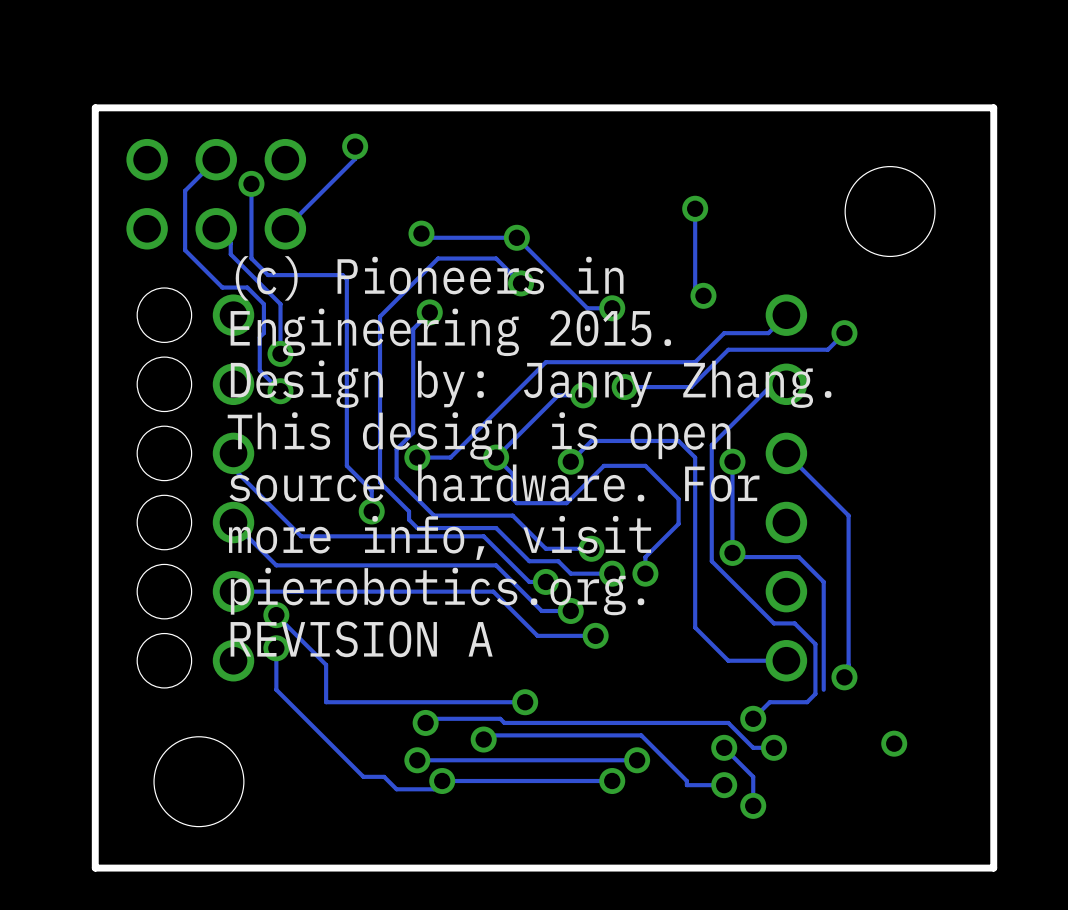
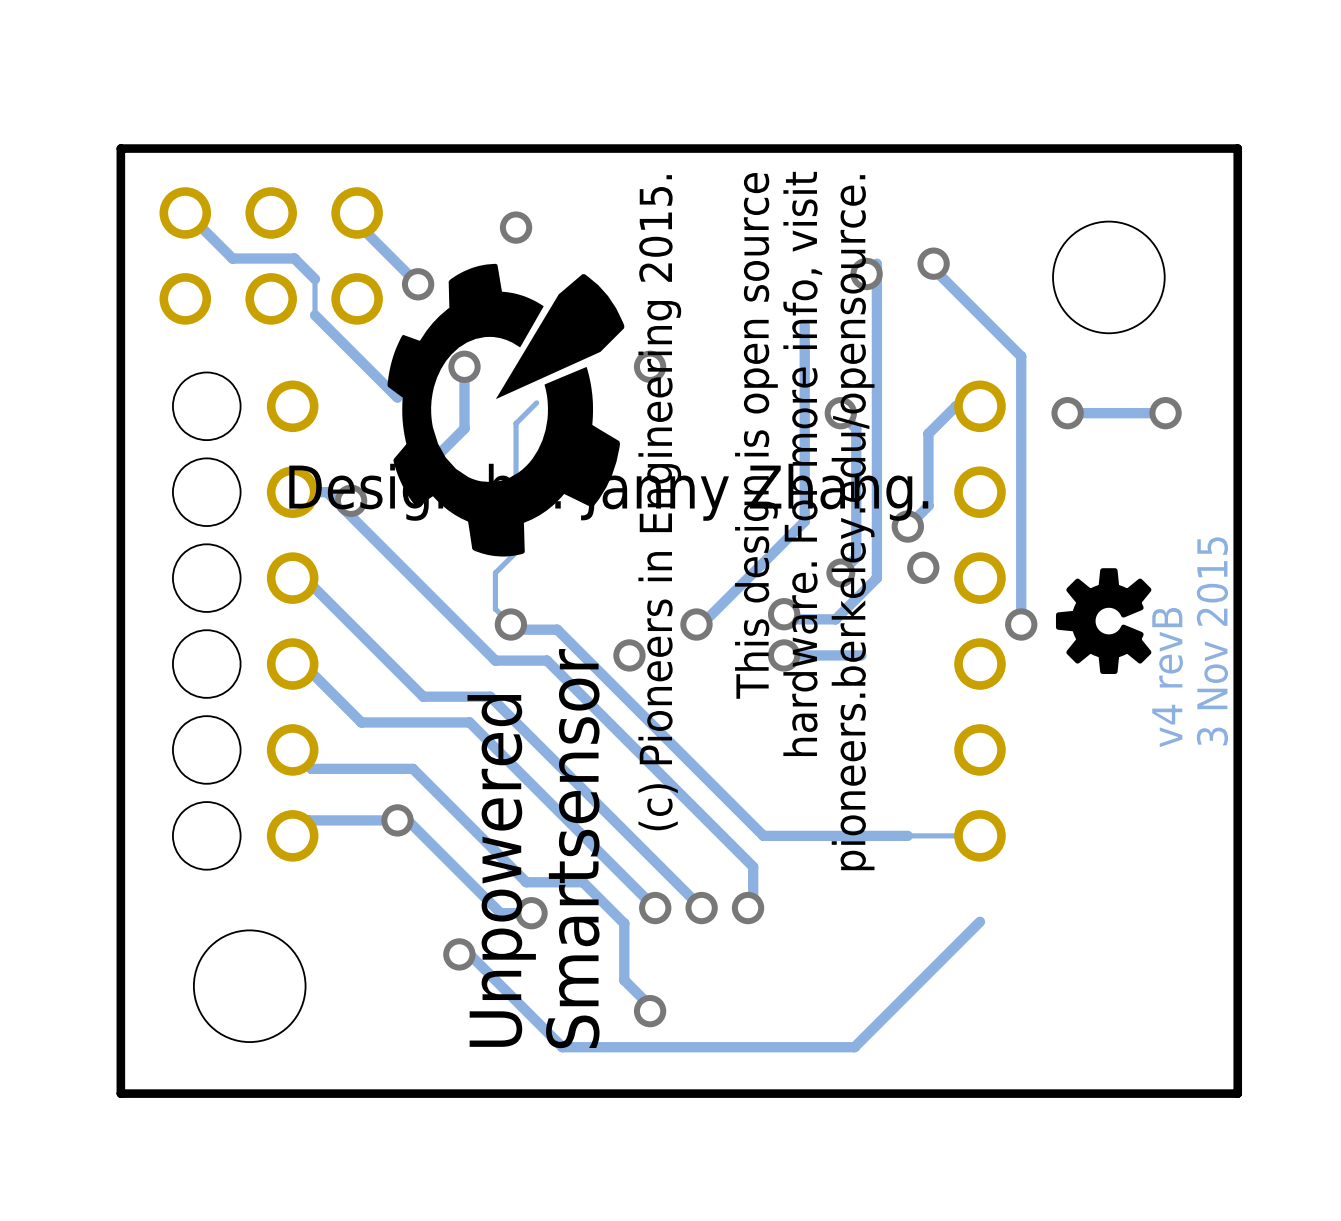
track: (355, 146) (355, 158) (285, 228) -> none
via: (355, 146) -> none
track: (216, 159) (185, 190) (185, 250) (222, 287) (247, 287) (263, 304) (263, 333) (259, 337) (259, 370) (280, 391) -> none
track: none -> (357, 212) (357, 223) (418, 284)
via: none -> (516, 227)
track: (251, 183) (251, 212) -> (185, 212) (232, 258) (294, 258) (315, 279)
via: (251, 183) -> none
drawing: none -> [387, 263, 625, 557]
track: none -> (876, 263) (876, 578) (835, 619) (789, 619) (784, 614)
track: none -> (933, 263) (933, 268) (1021, 356) (1021, 624)
via: none -> (933, 263)
track: (695, 208) (695, 287) (703, 295) -> none
via: none -> (418, 284)
track: (216, 228) (230, 243) (230, 254) (280, 304) (280, 353) -> none
track: (421, 233) (425, 237) (516, 237) (587, 308) (612, 308) -> none
via: (421, 233) -> none
via: (516, 237) -> none
track: (251, 241) (251, 258) (268, 275) (342, 275) (346, 279) (346, 465) (371, 490) (371, 511) -> (315, 315) (397, 397)
track: none -> (804, 325) (804, 521) (701, 624) (696, 624)
text: (c) Pioneers in (429, 278) -> none
track: none -> (464, 366) (464, 428) (438, 454)
via: none -> (464, 366)
track: (521, 283) (496, 258) (438, 258) (380, 316) (380, 482) (409, 511) (409, 519) (417, 528) (496, 528) (529, 561) (558, 561) (570, 573) (612, 573) -> none
via: (703, 295) -> none
via: (612, 308) -> none
via: (429, 312) -> none
track: (786, 315) (768, 333) (724, 333) (695, 362) (545, 362) (450, 457) (417, 457) -> (979, 406) (955, 406) (928, 433) (928, 505) (907, 526)
track: none -> (840, 413) (856, 428) (856, 557) (840, 572)
via: none -> (840, 413)
track: none -> (1165, 413) (1067, 413)
via: none -> (1165, 413)
text: Engineering 2015. (450, 332) -> none
track: (844, 333) (827, 349) (728, 349) (691, 387) (624, 387) -> none
via position: (844, 333) -> (1067, 413)
via: (280, 353) -> none
track: none -> (292, 492) (327, 492) (495, 660) (546, 660) (753, 866) (753, 902) (748, 908)
track: (786, 384) (772, 384) (711, 445) (711, 561) (773, 623) (794, 623) (815, 644) (815, 693) (807, 702) (769, 702) (753, 718) -> none
via: (624, 387) -> none
track: (583, 395) (558, 395) (496, 457) (512, 474) (512, 499) (516, 503) (566, 503) (603, 465) (645, 465) (678, 499) (678, 523) (645, 557) (645, 573) -> none
via: (583, 395) -> none
via: none -> (907, 526)
text: This design is open (479, 436) -> This design is open source (756, 435)
drawing: none -> [1055, 568, 1152, 674]
via: none -> (840, 572)
track: (233, 453) (233, 468) (301, 536) (483, 536) (529, 581) (545, 581) -> (292, 578) (304, 578) (423, 696) (490, 696) (701, 908)
track: (786, 453) (848, 515) (848, 664) (844, 669) (844, 677) -> none
via: (417, 457) -> none
via: (496, 457) -> none
text: none -> (c) Pioneers in Engineering 2015. (659, 502)
text: none -> pioneers.berkeley.edu/opensource. (853, 522)
track: (570, 461) (591, 440) (678, 440) (695, 457) (695, 627) (728, 660) -> (516, 629) (557, 629) (763, 835) (907, 835)
via: (570, 461) -> none
track: (732, 461) (732, 552) (736, 557) (798, 557) (823, 581) (823, 689) -> none
via position: (732, 461) -> (923, 567)
via: none -> (784, 614)
text: source hardware. For (494, 483) -> none
via: none -> (510, 624)
via: none -> (696, 624)
via: none -> (1021, 624)
track: (413, 494) (433, 515) (512, 515) (545, 548) (591, 548) -> none
text: none -> 3 Nov 2015 (1212, 641)
via: (371, 511) -> none
via: none -> (629, 655)
via: none -> (784, 655)
track: none -> (861, 655) (784, 655)
track: (233, 522) (276, 565) (496, 565) (541, 610) (570, 610) -> (292, 664) (302, 664) (361, 722) (469, 722) (655, 908)
text: none -> v4 revB (1167, 677)
text: more info, visit (440, 537) -> hardware. For more info, visit (802, 463)
via: (591, 548) -> none
via: (732, 552) -> none
via: (612, 573) -> none
via: (645, 573) -> none
via: (545, 581) -> none
track: (233, 591) (493, 591) (537, 635) (595, 635) -> (292, 749) (311, 768) (412, 768) (526, 882) (583, 882) (624, 923) (624, 980) (650, 1005) (650, 1011)
text: pierobotics.org. (437, 591) -> none
via: (570, 610) -> none
track: (276, 615) (326, 664) (326, 702) (525, 702) -> none
via: (276, 615) -> none
via: (595, 635) -> none
text: REVISION A (361, 639) -> none
track: (276, 648) (276, 689) (363, 776) (384, 776) (396, 789) (433, 789) (442, 781) (612, 781) -> none
via: (276, 648) -> none
via: none -> (397, 820)
text: none -> Smartsensor (572, 848)
track: none -> (292, 835) (308, 820) (407, 820) (500, 913) (536, 913)
via: (844, 677) -> none
text: none -> Unpowered (501, 870)
via position: (525, 702) -> (655, 908)
via: none -> (701, 908)
via: none -> (748, 908)
via: (753, 718) -> none
track: (425, 722) (429, 718) (500, 718) (504, 722) (728, 722) (753, 747) (773, 747) -> none
track: none -> (979, 921) (854, 1047) (562, 1047) (469, 954) (459, 954)
track: (483, 739) (487, 735) (641, 735) (686, 781) (686, 785) (724, 785) -> none
via: (483, 739) -> none
via: (894, 743) -> none
track: (724, 747) (753, 776) (753, 805) -> none
via: (724, 747) -> none
via: (773, 747) -> none
via: none -> (459, 954)
via: (417, 760) -> none
track: (637, 760) (417, 760) -> none
via: (637, 760) -> none
via: (442, 781) -> none
via: (612, 781) -> none
via: (724, 785) -> none
via: none -> (650, 1011)
via: (753, 805) -> none

